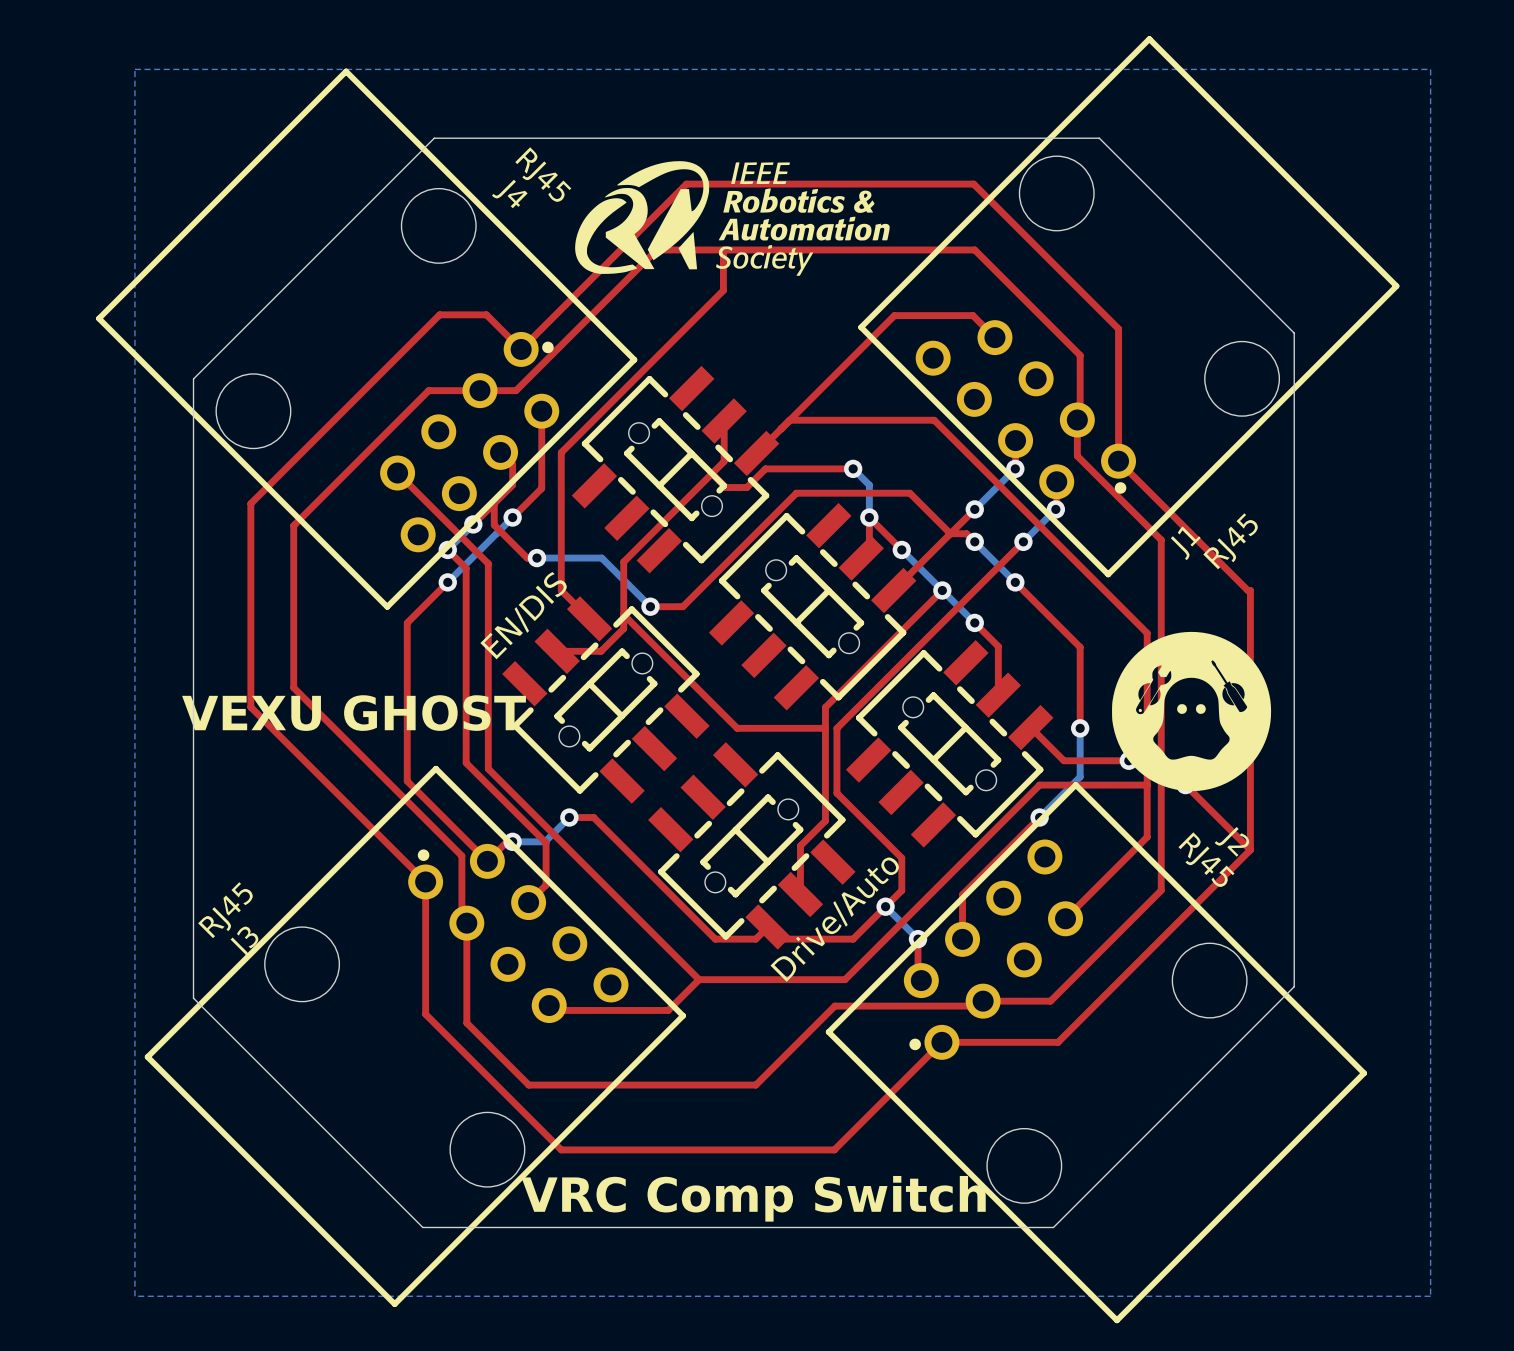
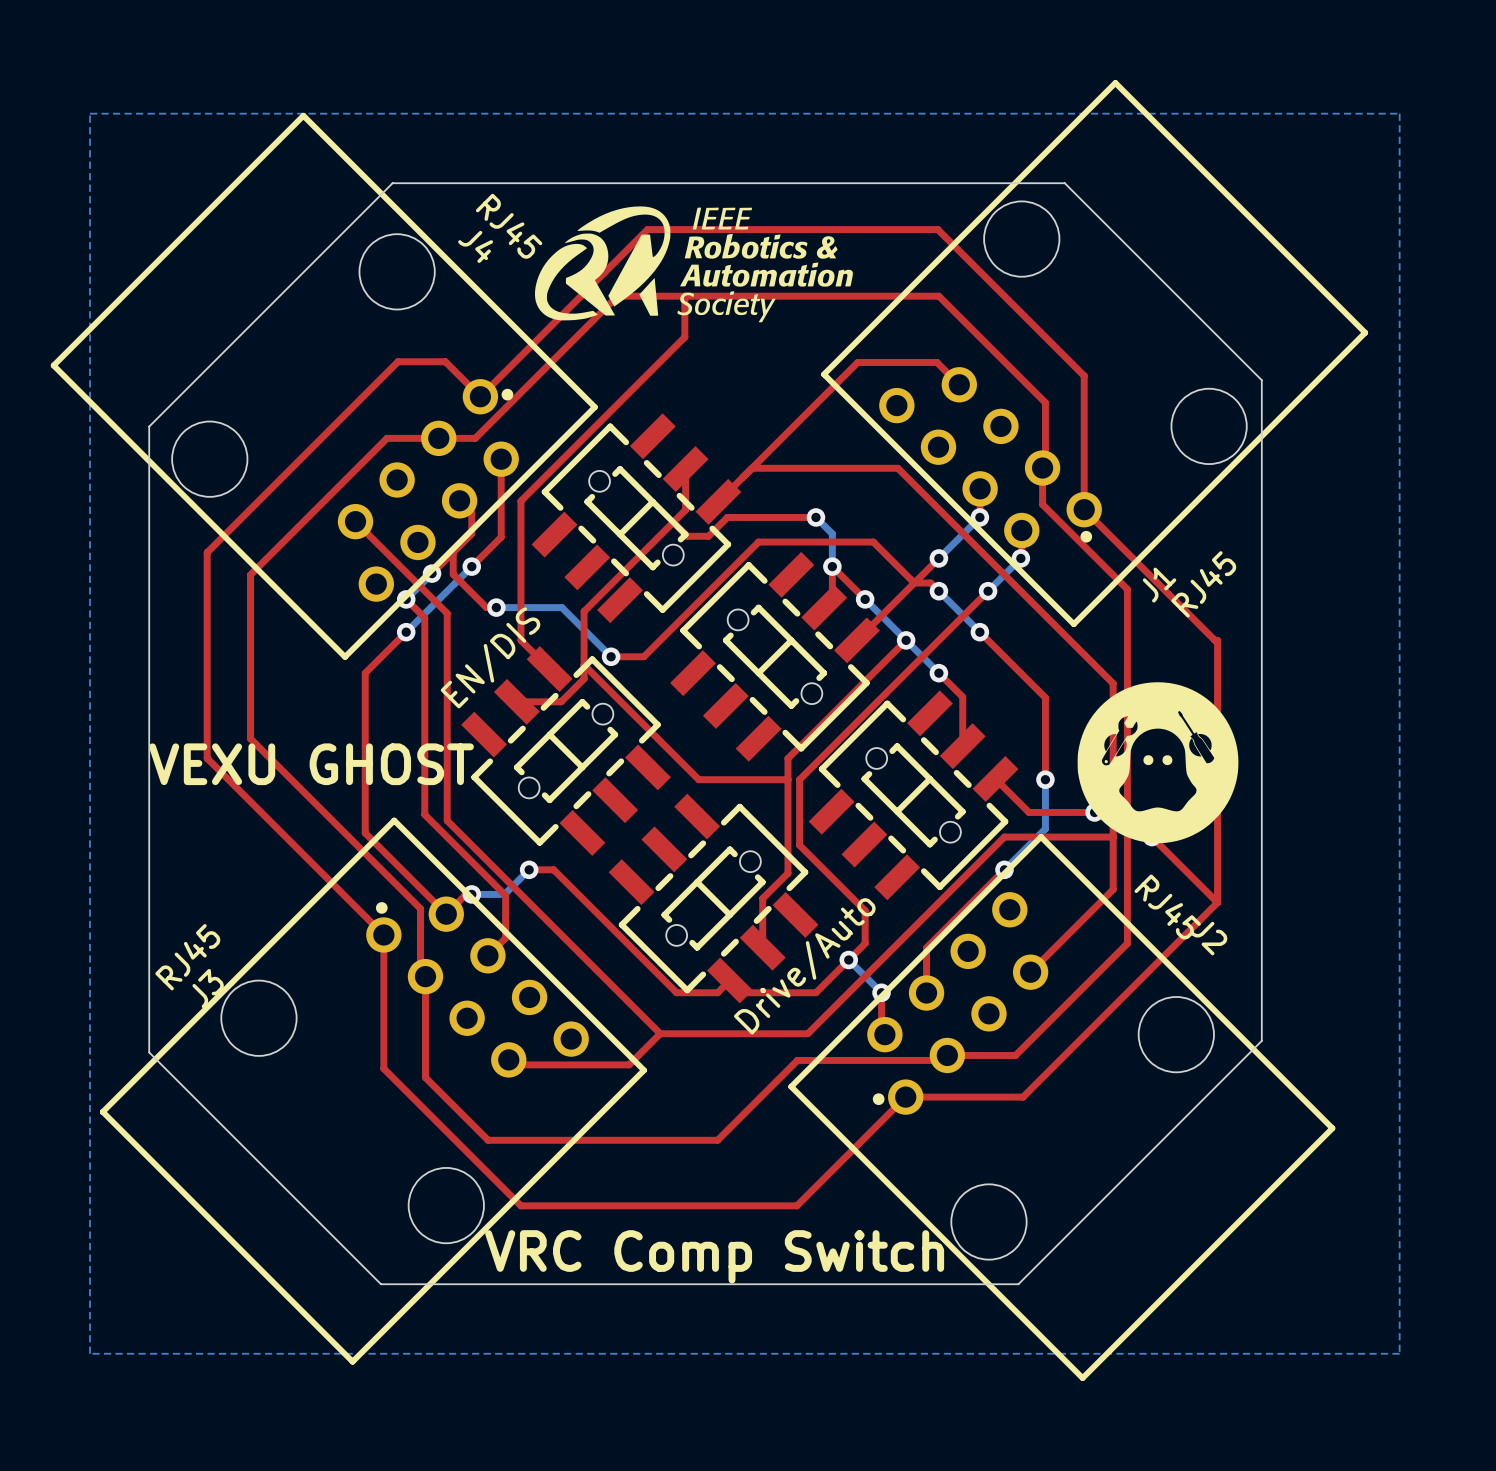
J2 name position: J2 (1232, 841) -> J2 (1208, 938)

